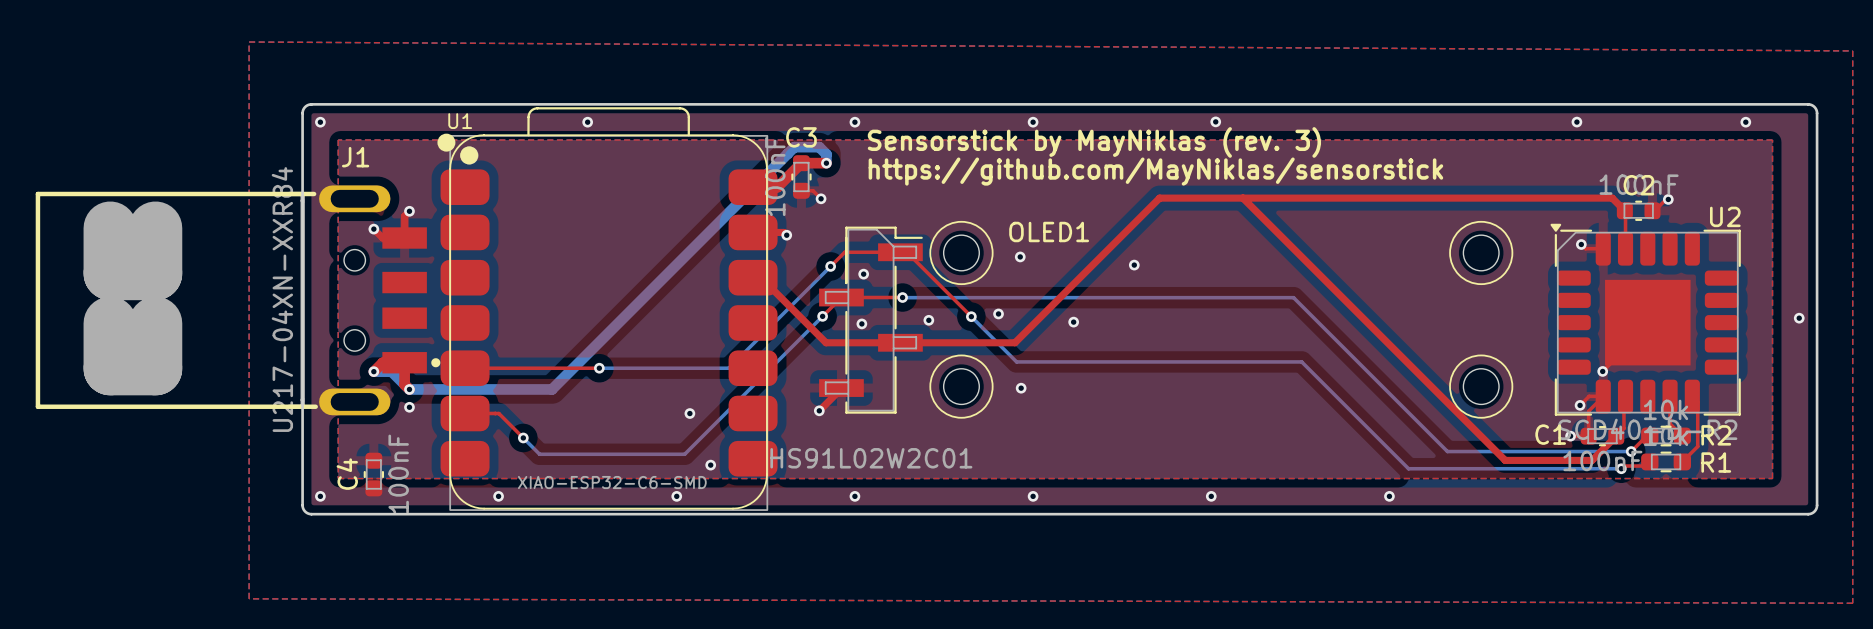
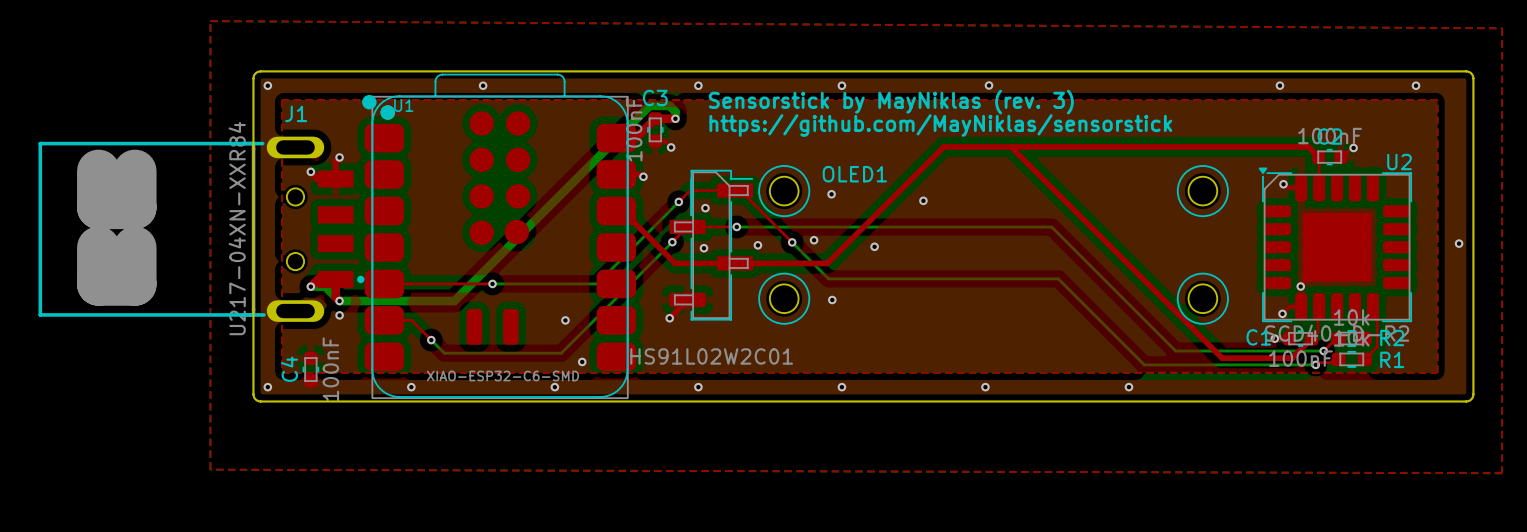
U1 footprint: [437, 107, 778, 511] -> [362, 73, 637, 399]
U1 name position: U1 (460, 121) -> U1 (403, 105)
top track: (1603, 396) (1588, 411) (1588, 436) -> none

